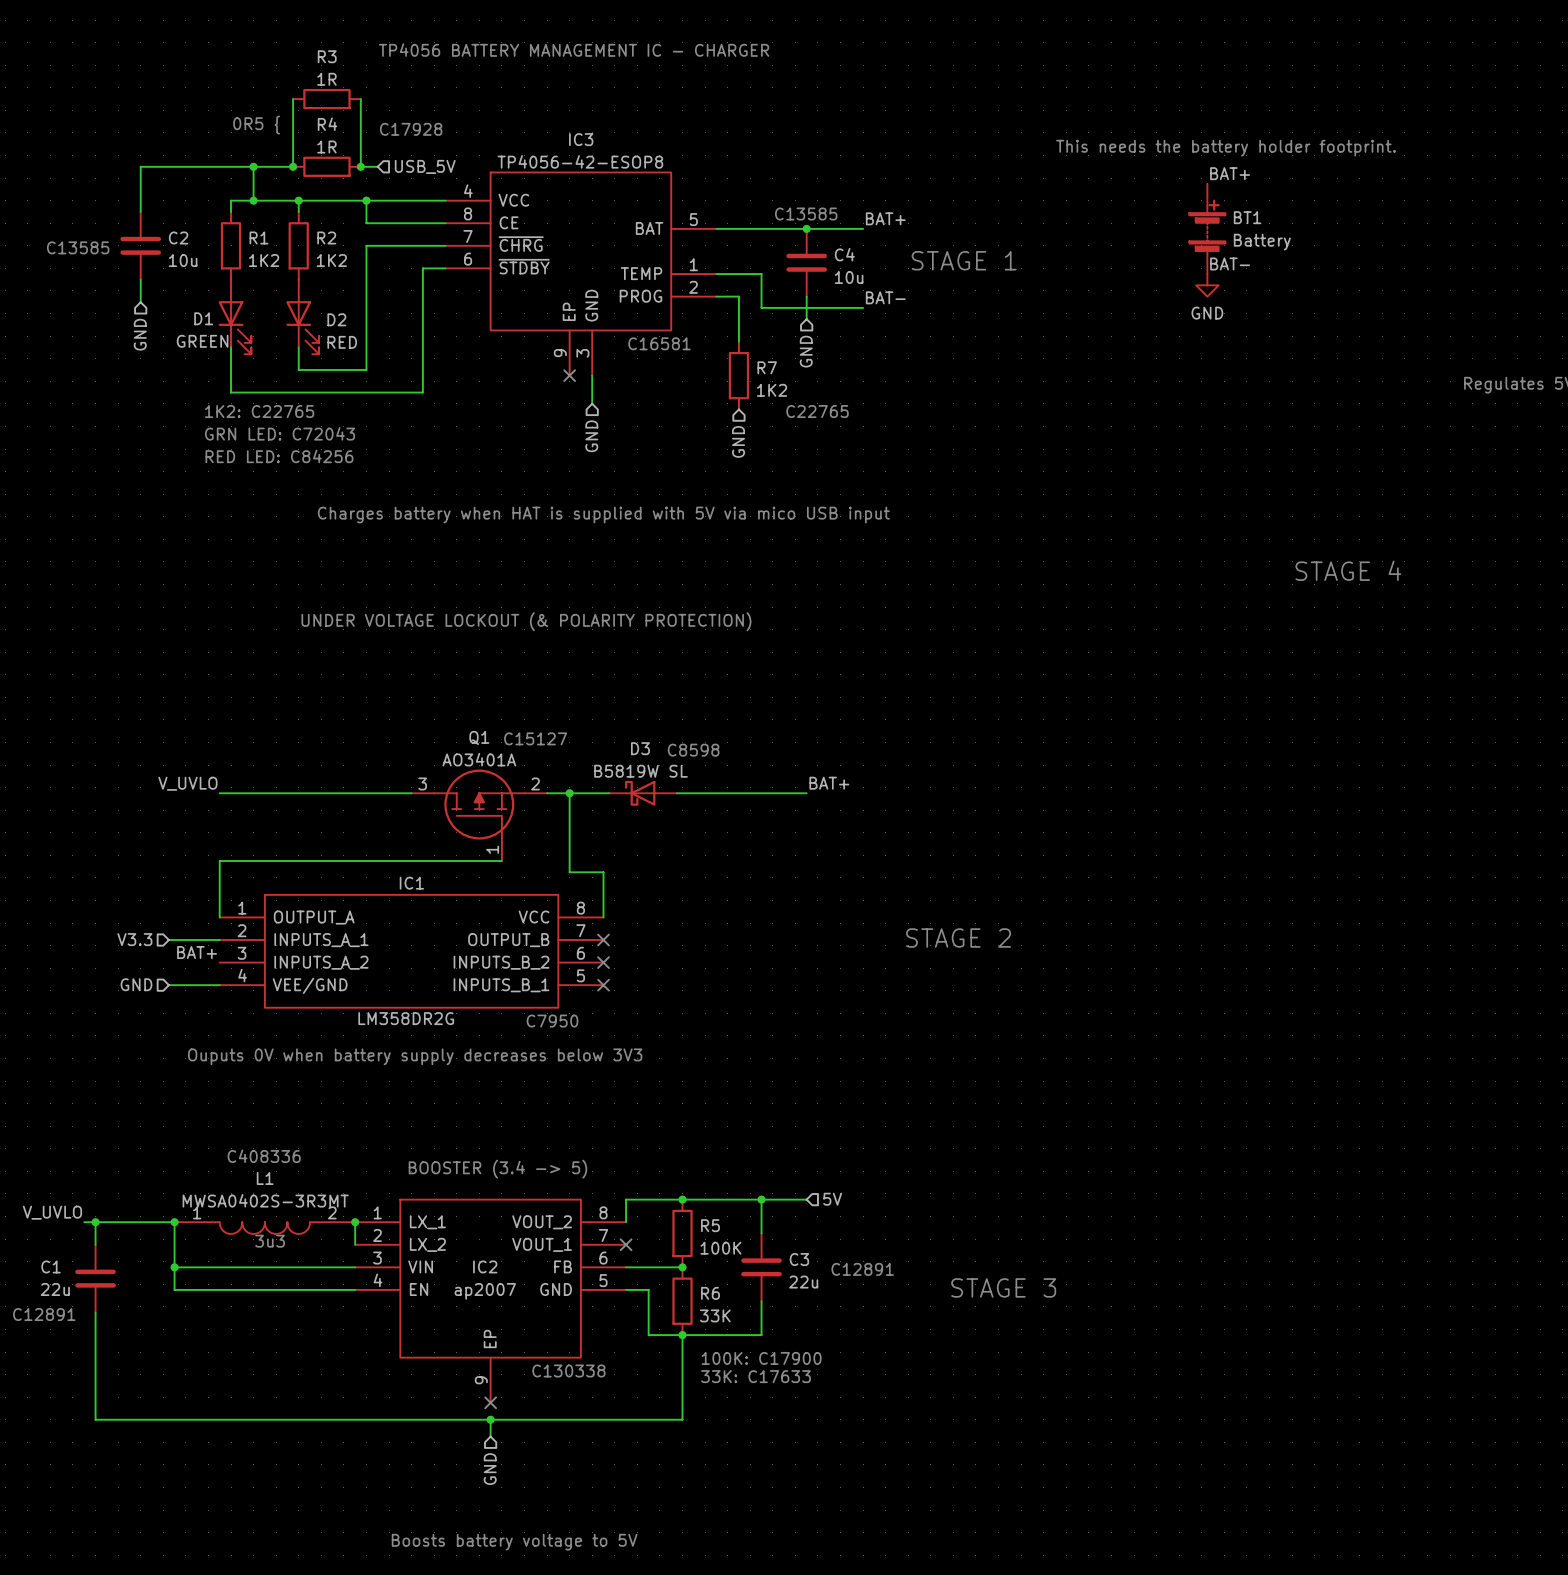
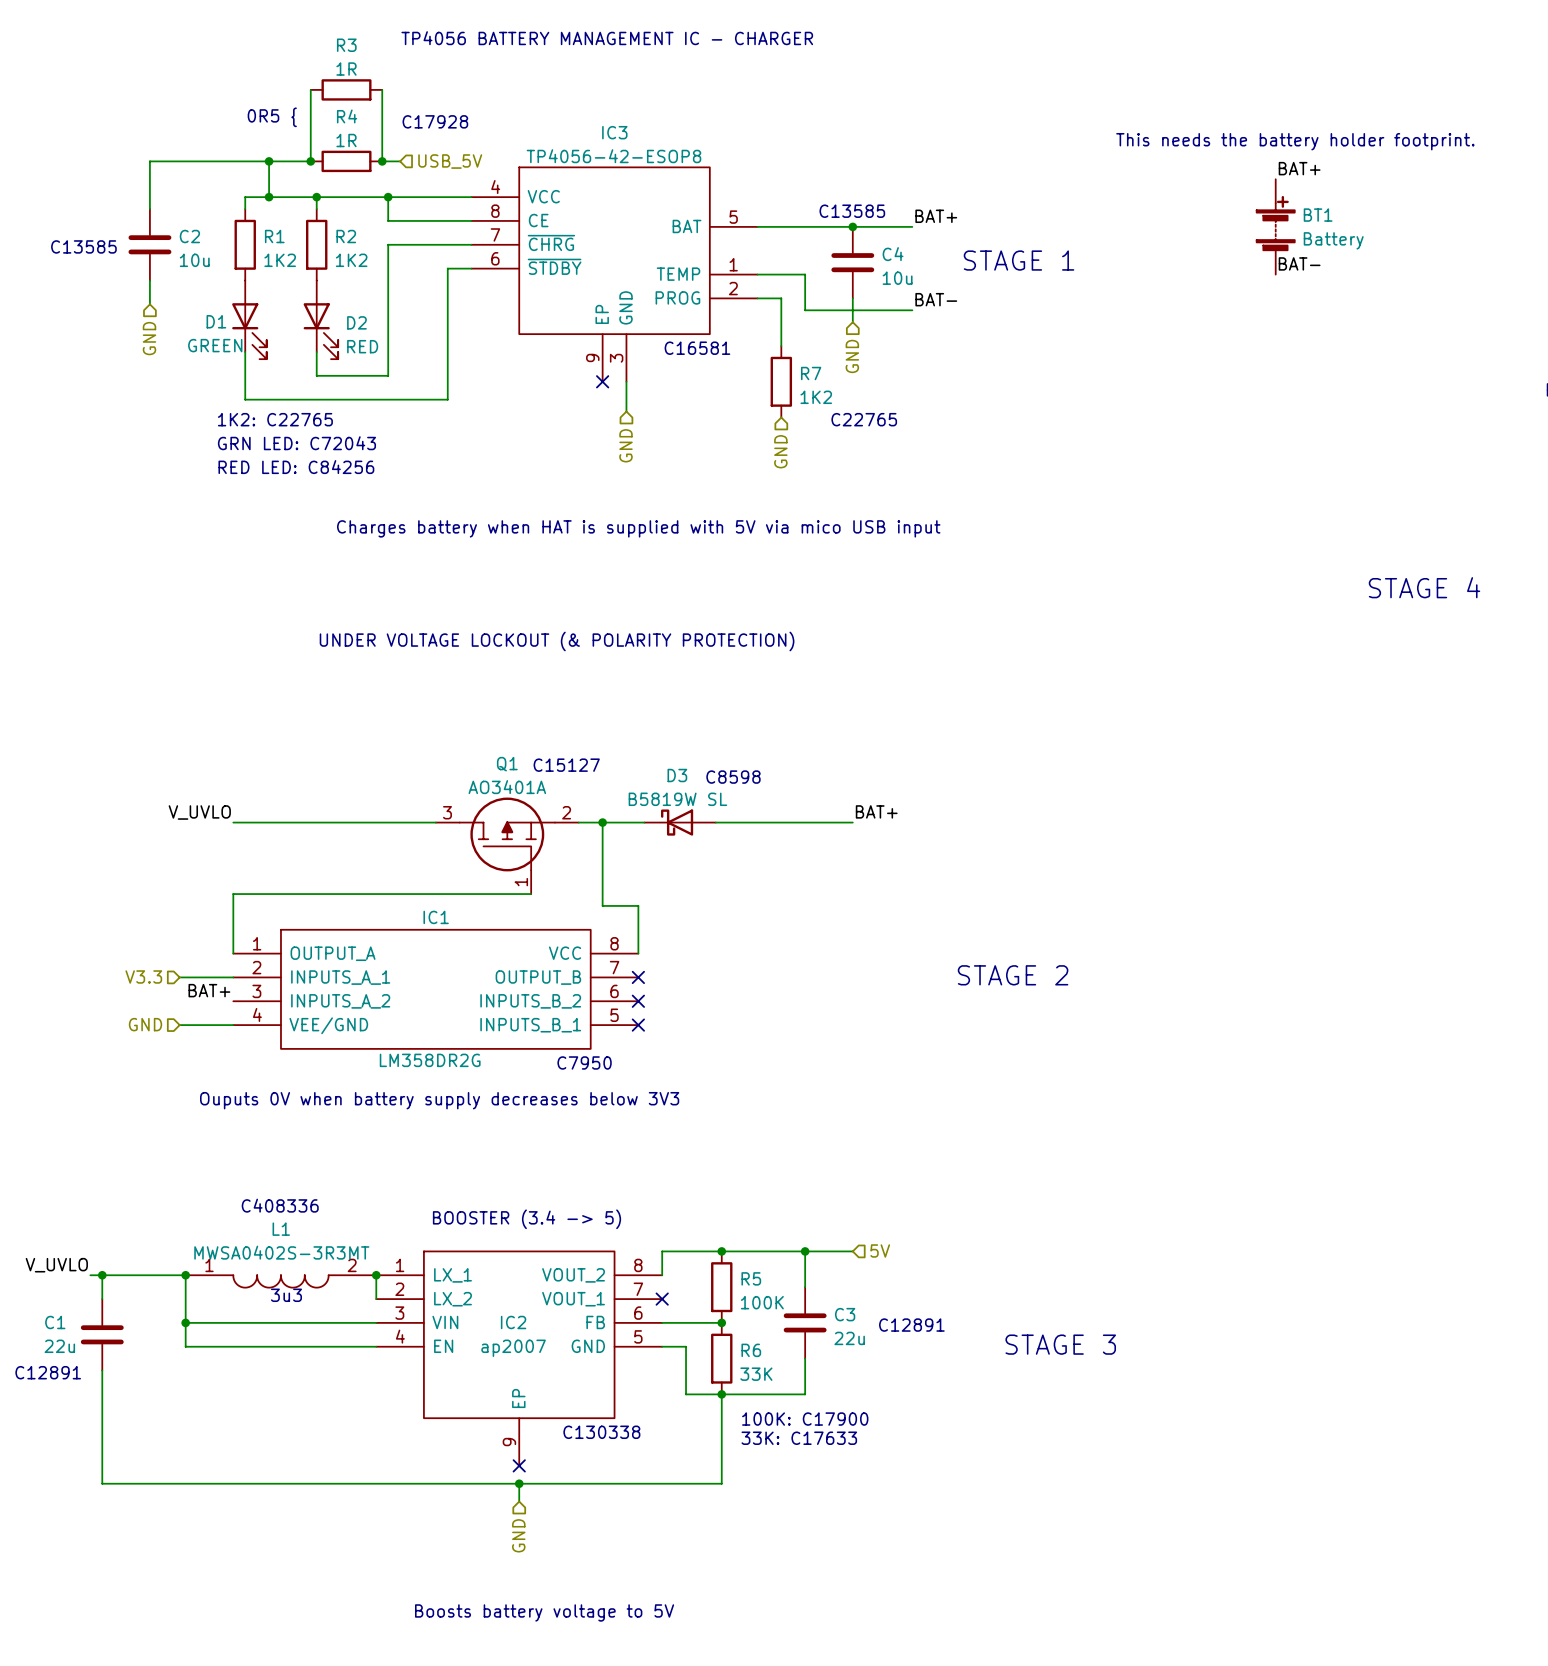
power symbol: GND (1207, 285) -> none

